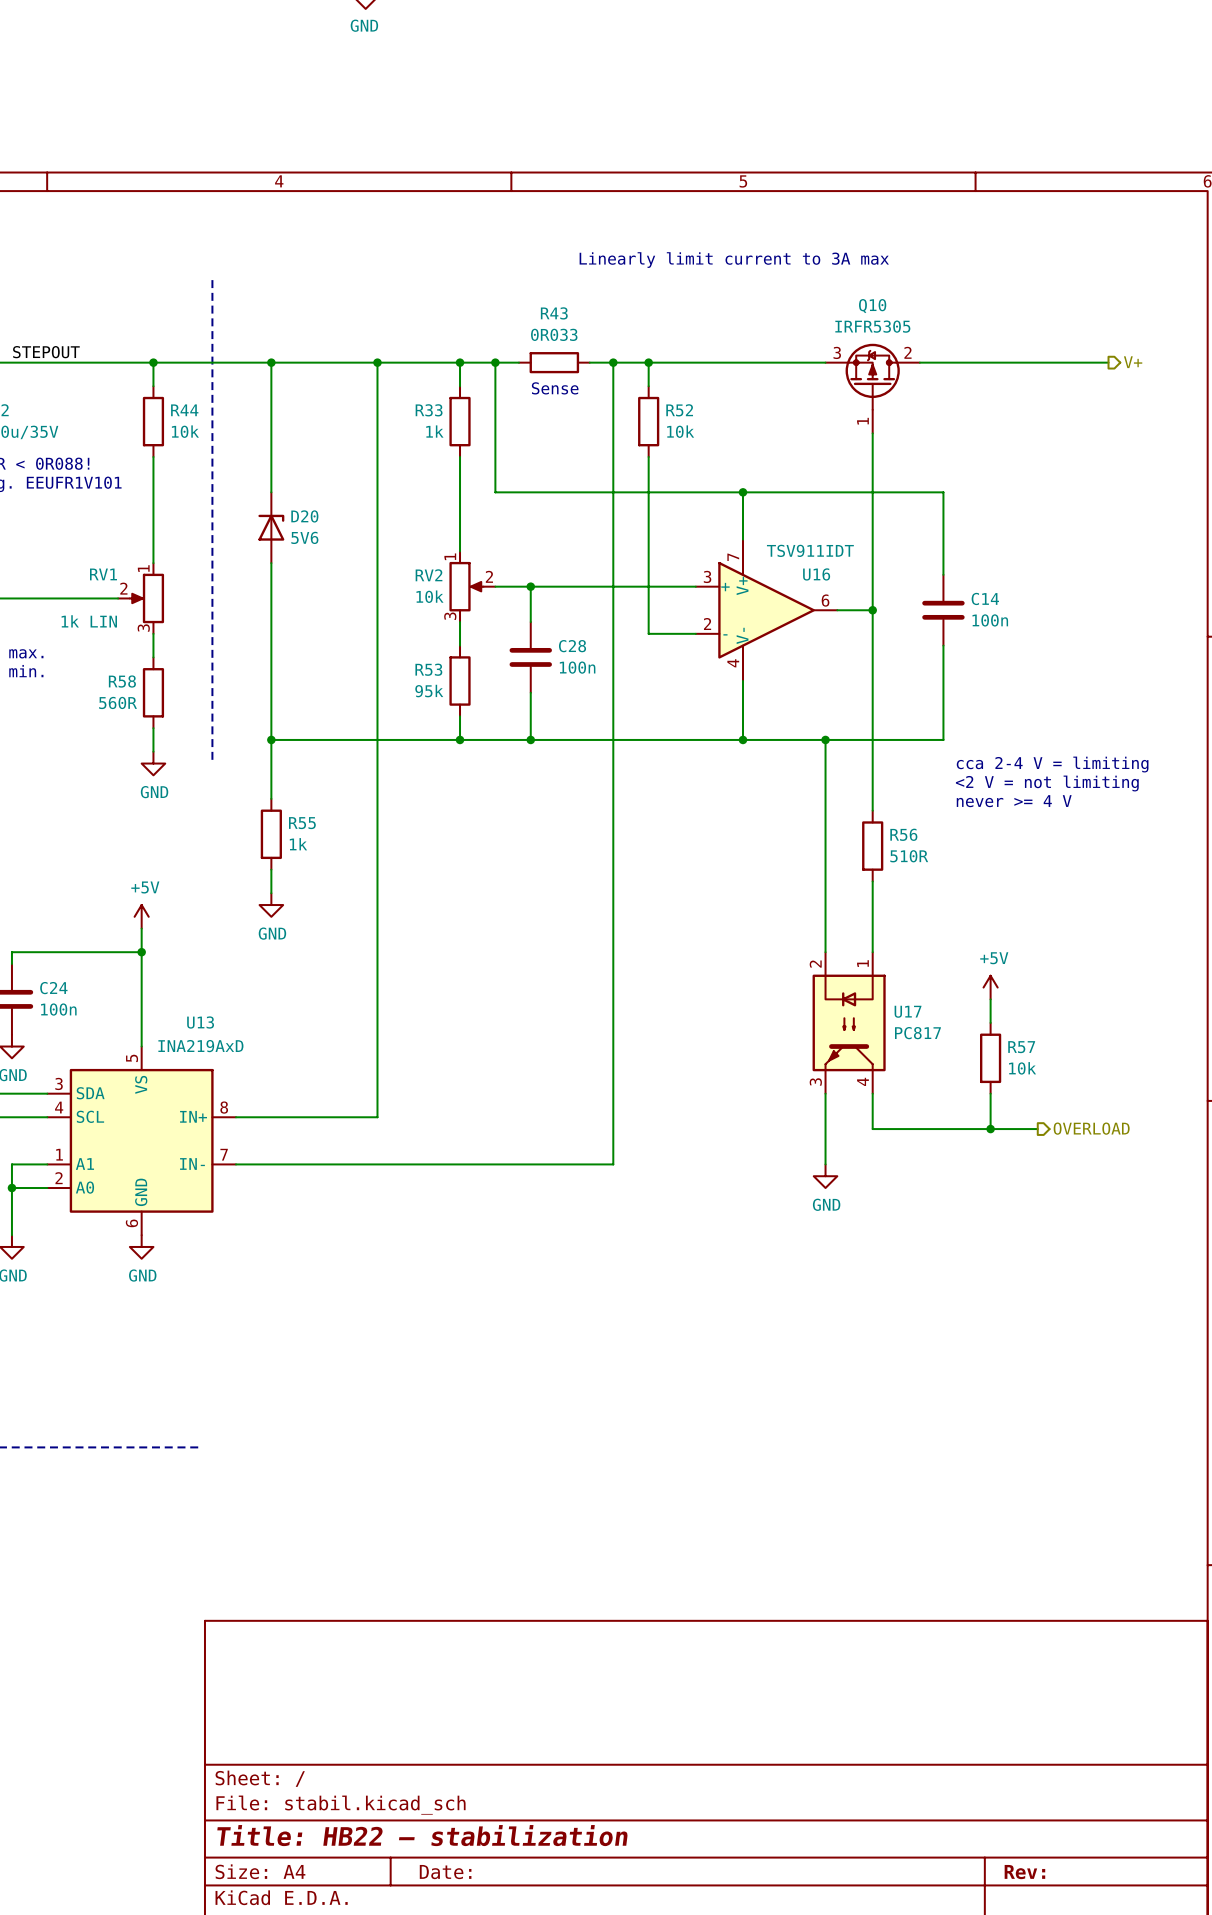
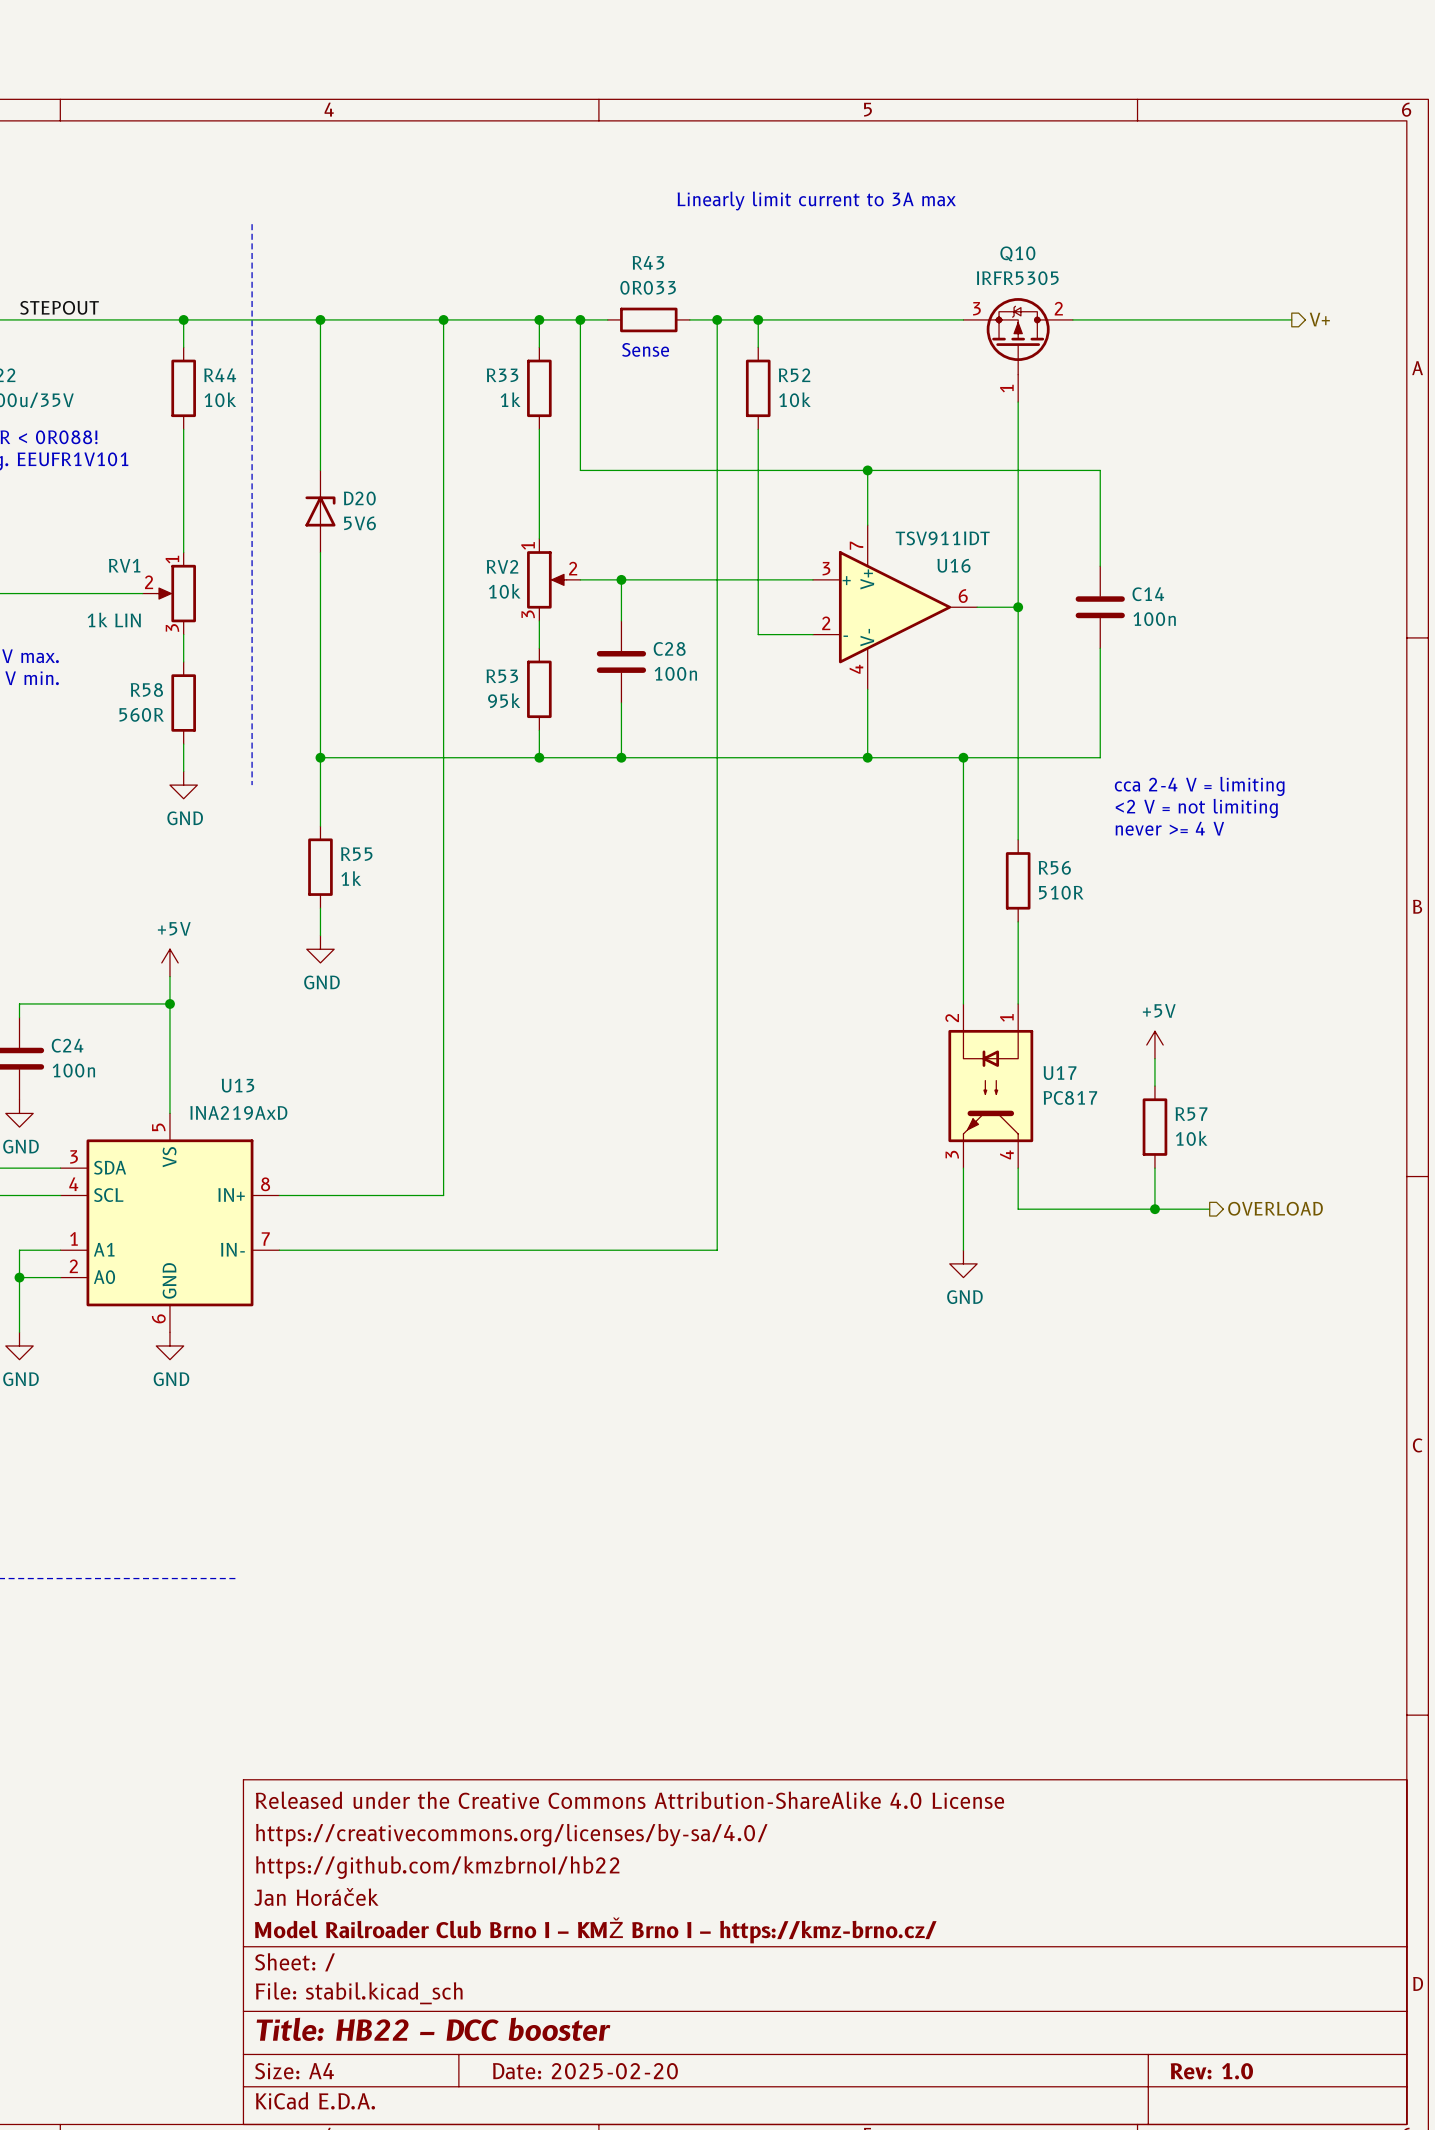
title block: none -> Released under the Creative Commons Attribution-ShareAlike 4.0 License (629, 1800)
title block: none -> https://creativecommons.org/licenses/by-sa/4.0/ (511, 1835)
title block: none -> https://github.com/kmzbrnoI/hb22 (437, 1867)
title block: none -> Jan Horáček (316, 1897)
title block: none -> Model Railroader Club Brno I – KMŽ Brno I – https://kmz-brno.cz/ (595, 1930)
title block: Title: HB22 – stabilization (422, 1835) -> Title: HB22 – DCC booster (433, 2029)
title block: Date: (445, 1872) -> Date: 2025-02-20 (585, 2071)
title block: Rev: (1024, 1872) -> Rev: 1.0 (1211, 2071)

